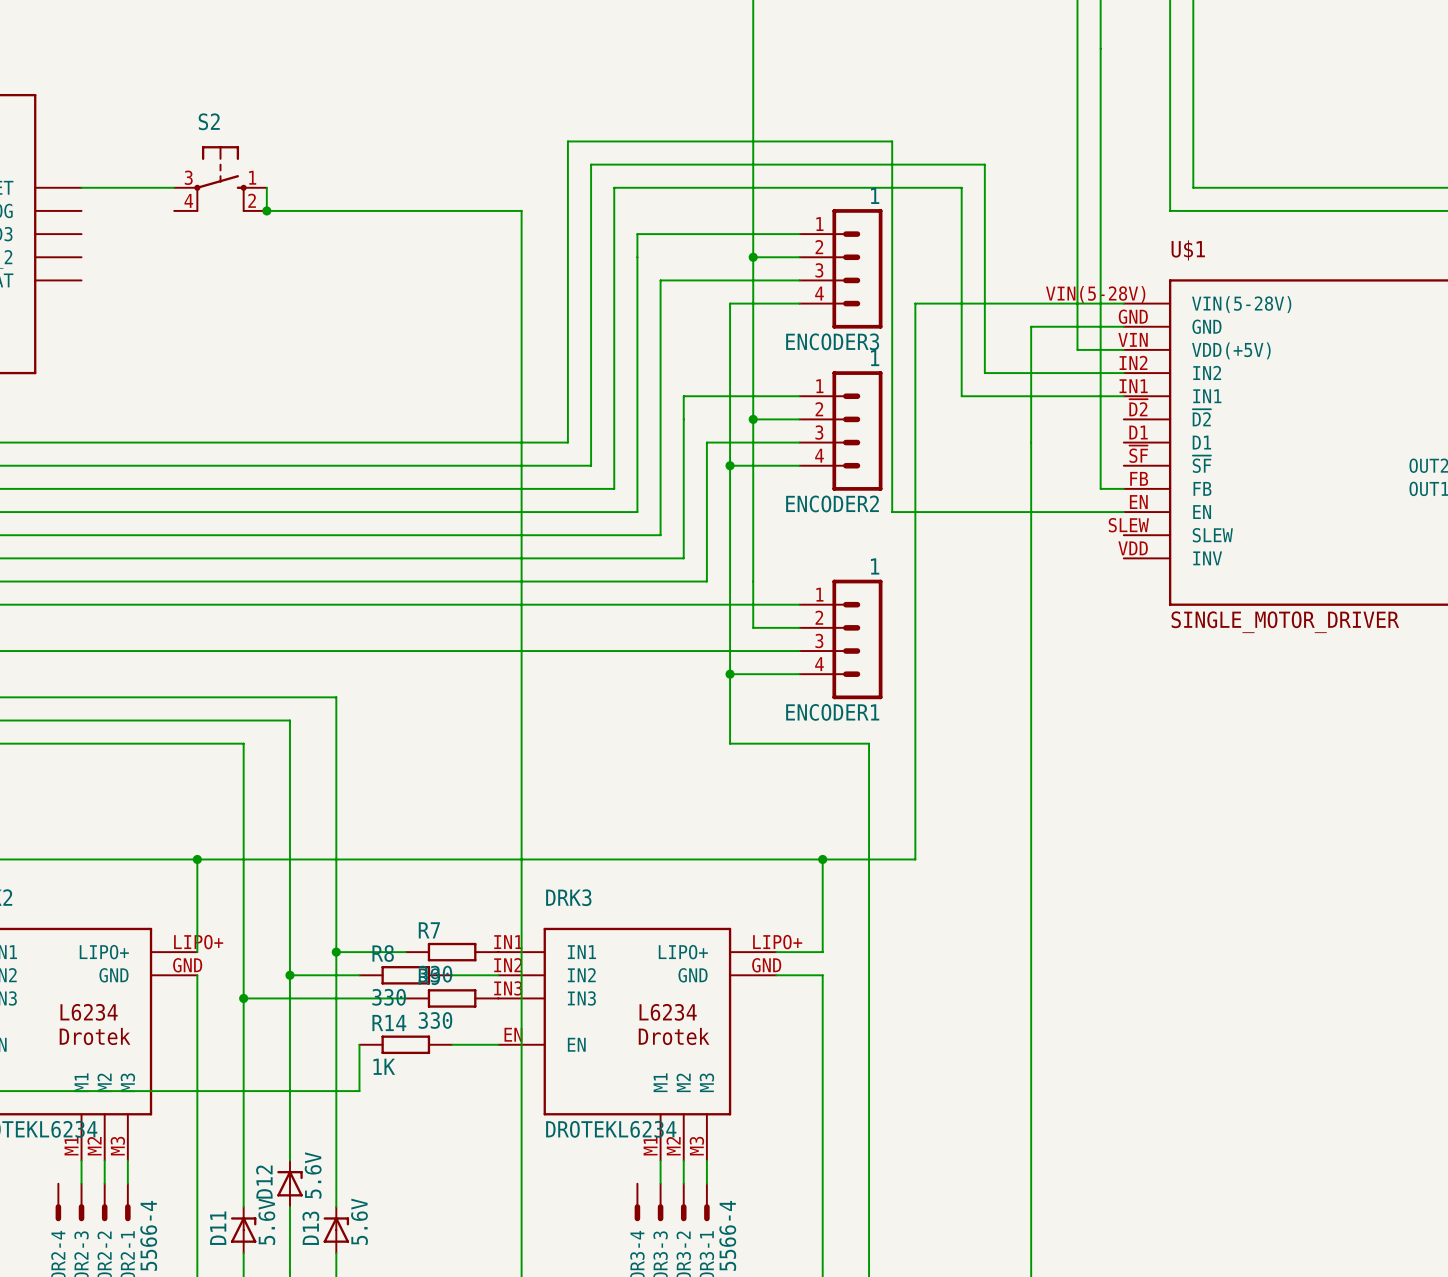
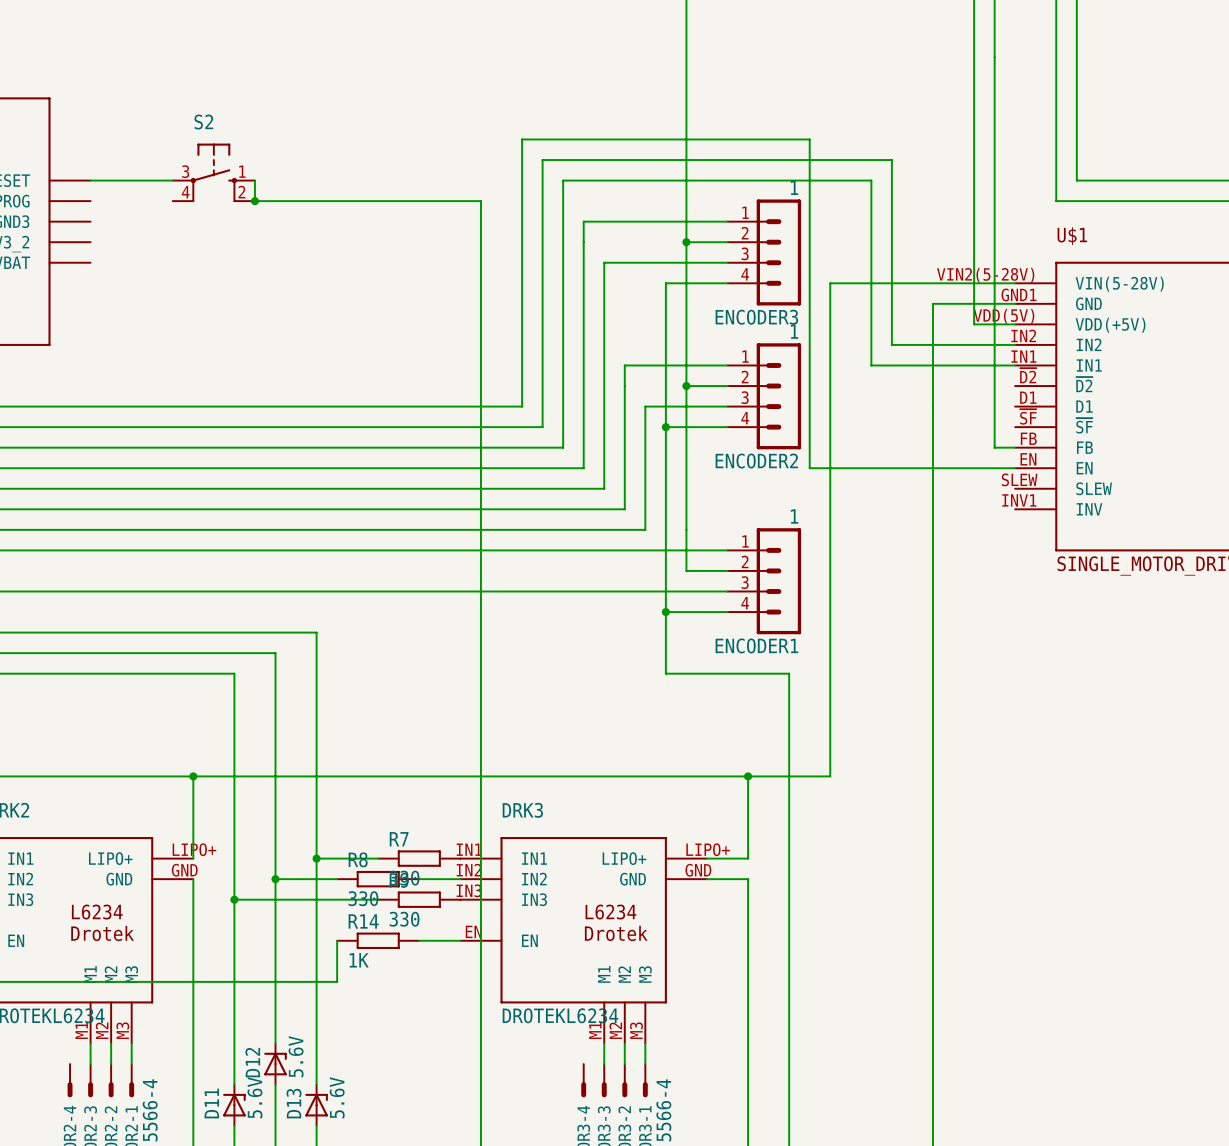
U$1 pin number: VIN(5-28V) (1095, 294) -> VIN2(5-28V) (985, 275)
U$1 pin number: GND (1133, 316) -> GND1 (1018, 294)
U$1 pin number: VIN (1133, 339) -> VDD(5V) (1003, 316)
U$1 pin number: VDD (1133, 548) -> INV1 (1019, 500)

